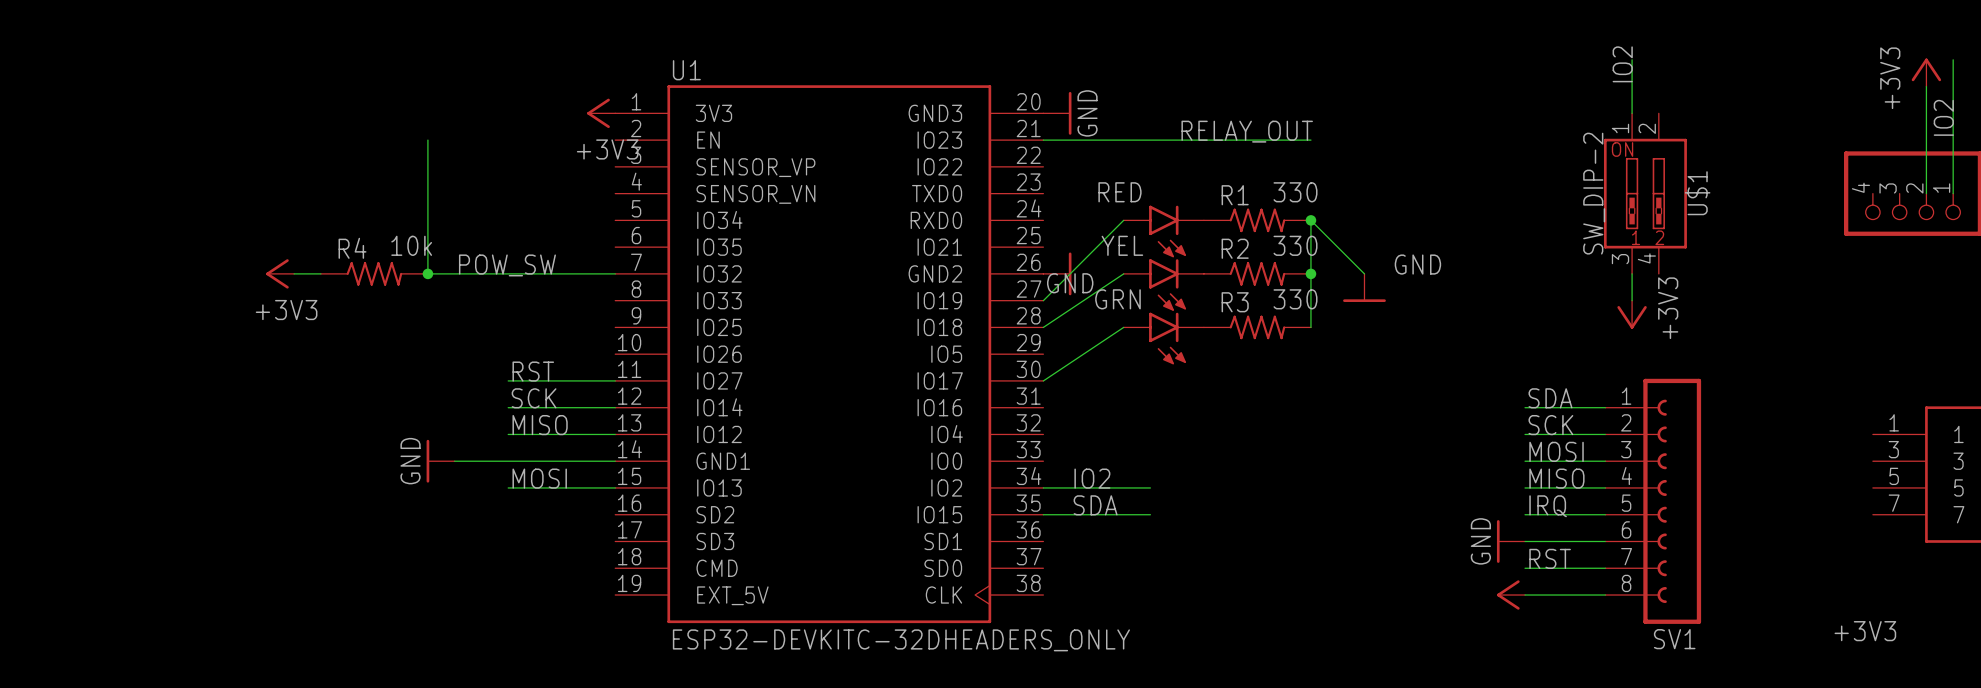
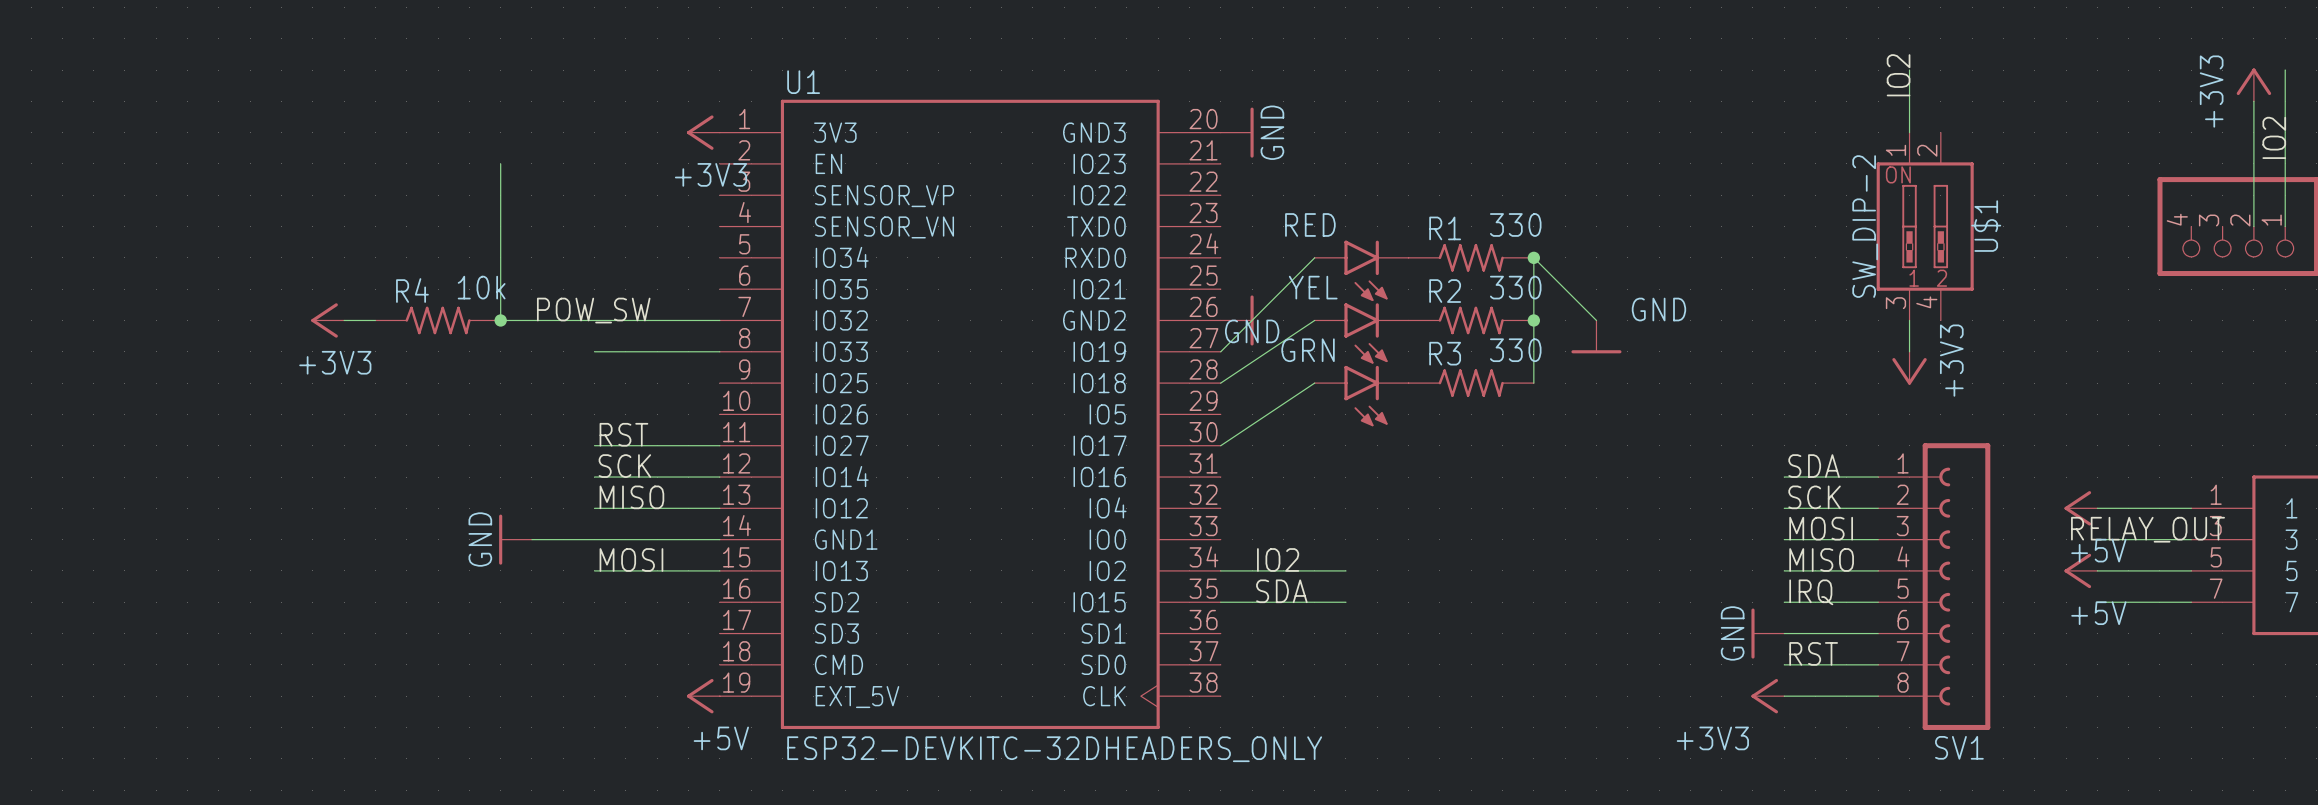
label: RELAY_OUT (1247, 131) -> none
wire: (1043, 140) (1310, 140) -> none
wire: none -> (594, 351) (719, 351)
power symbol: none -> +5V (2080, 508)
wire: none -> (2097, 508) (2191, 508)
label: none -> RELAY_OUT (2147, 529)
wire: none -> (2097, 539) (2191, 539)
power symbol: none -> +5V (2080, 570)
wire: none -> (2097, 570) (2191, 570)
wire: none -> (2097, 602) (2191, 602)
power symbol: none -> +5V (703, 696)
power symbol text position: +3V3 (1865, 631) -> +3V3 (1712, 738)

